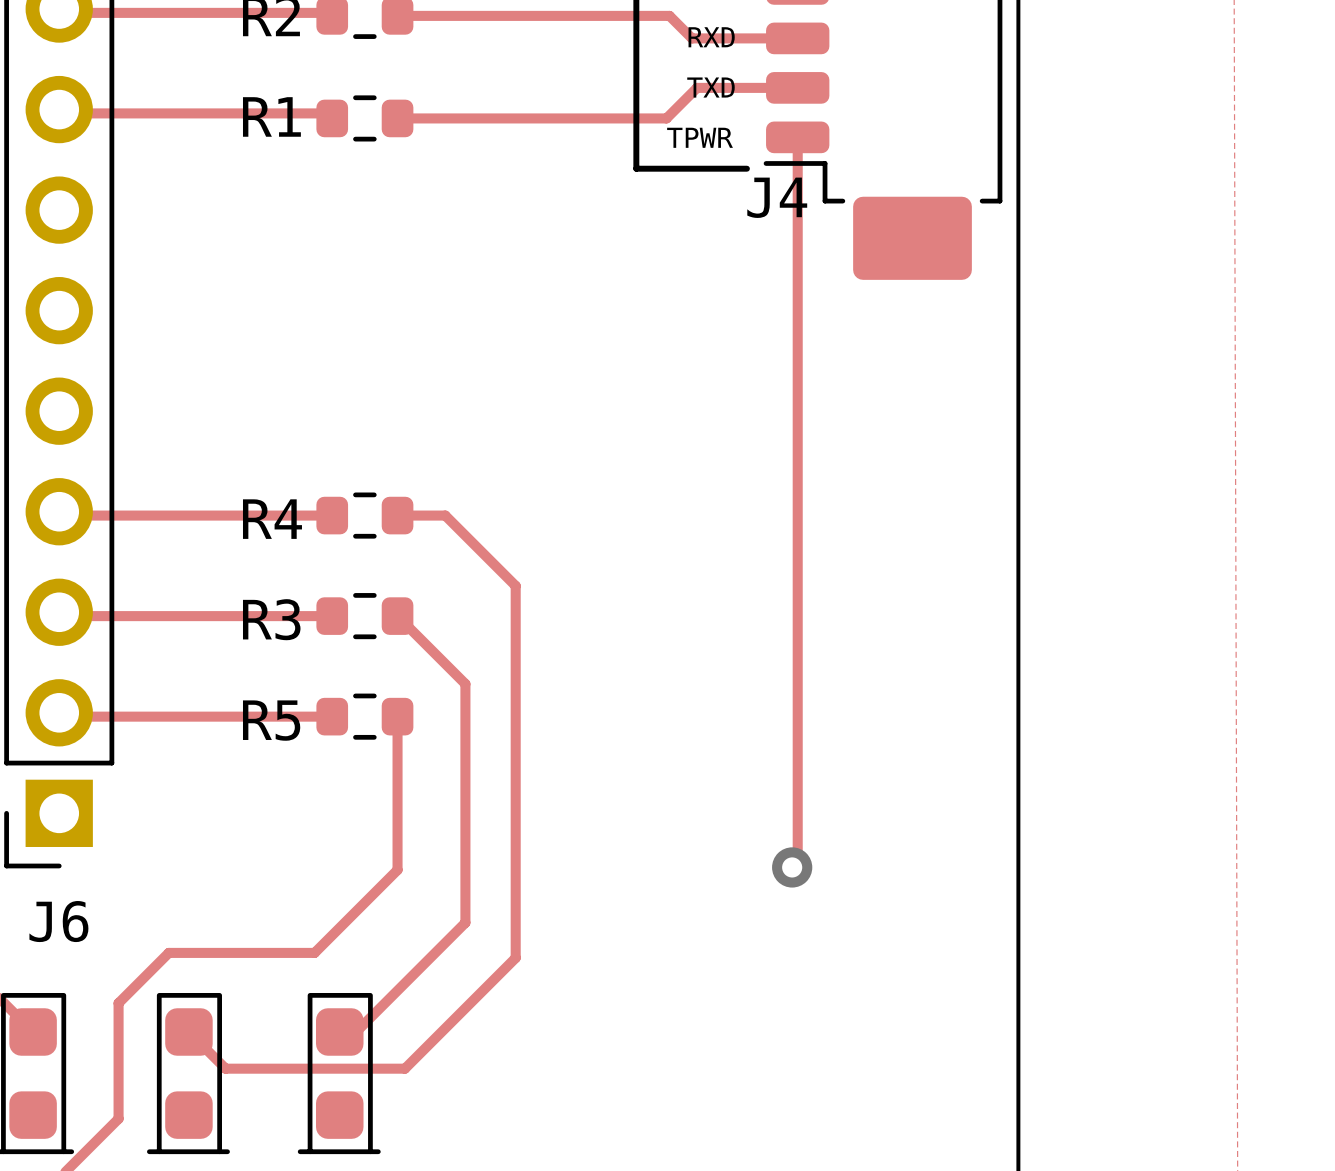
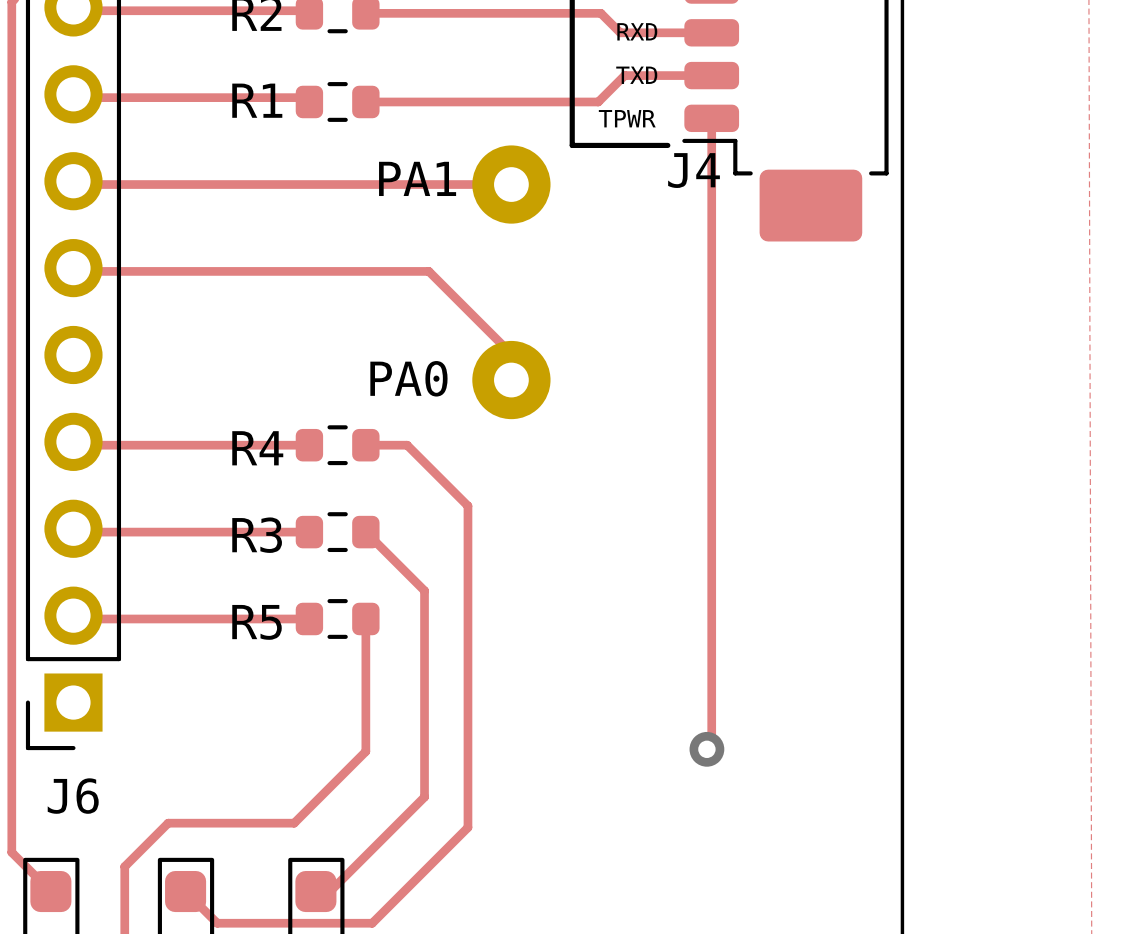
text: none -> PA1 (417, 178)
track: none -> (76, 184) (511, 184)
part: none -> (511, 184)
track: none -> (76, 271) (428, 271) (511, 353) (511, 380)
text: none -> PA0 (408, 378)
part: none -> (511, 380)

